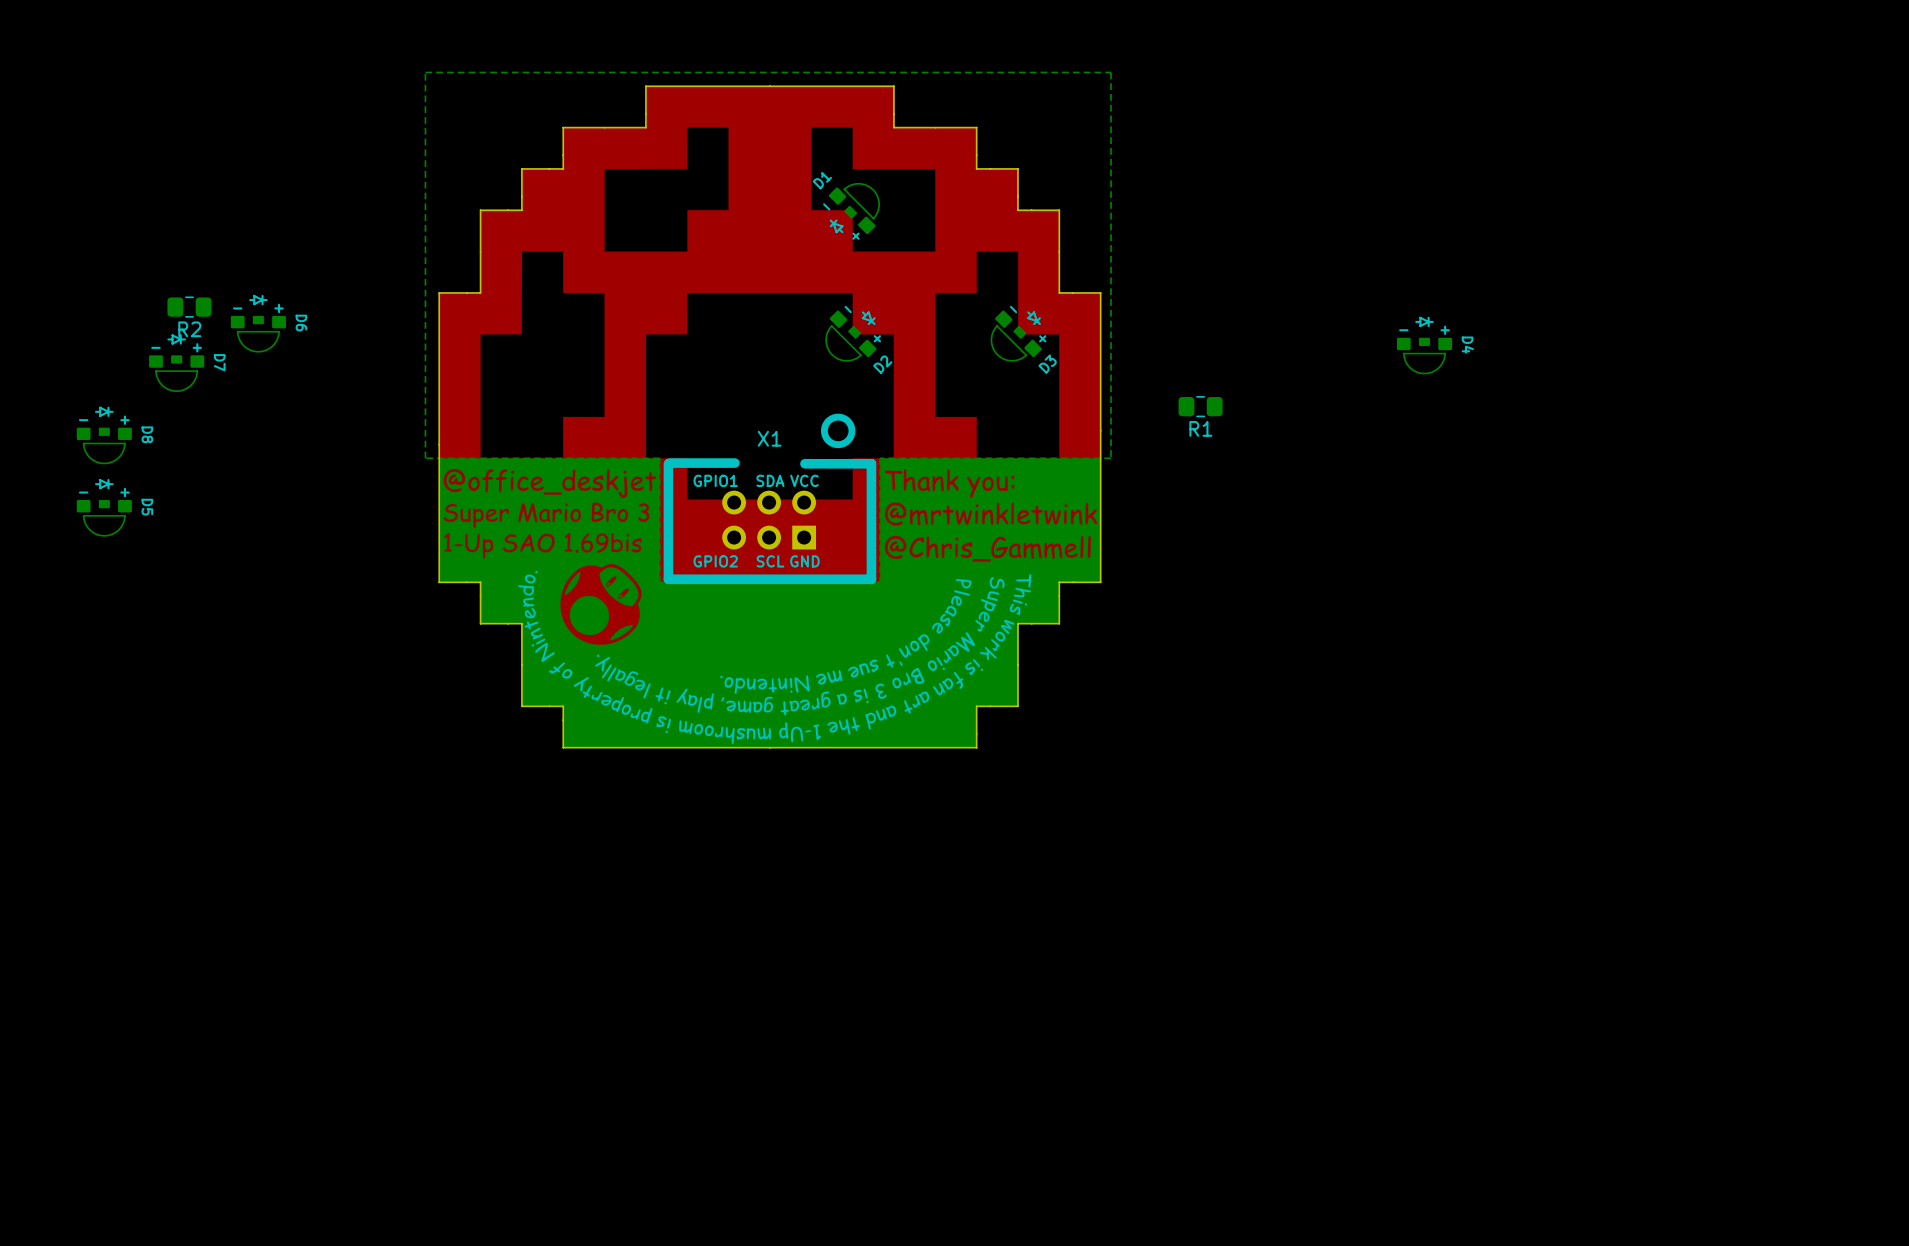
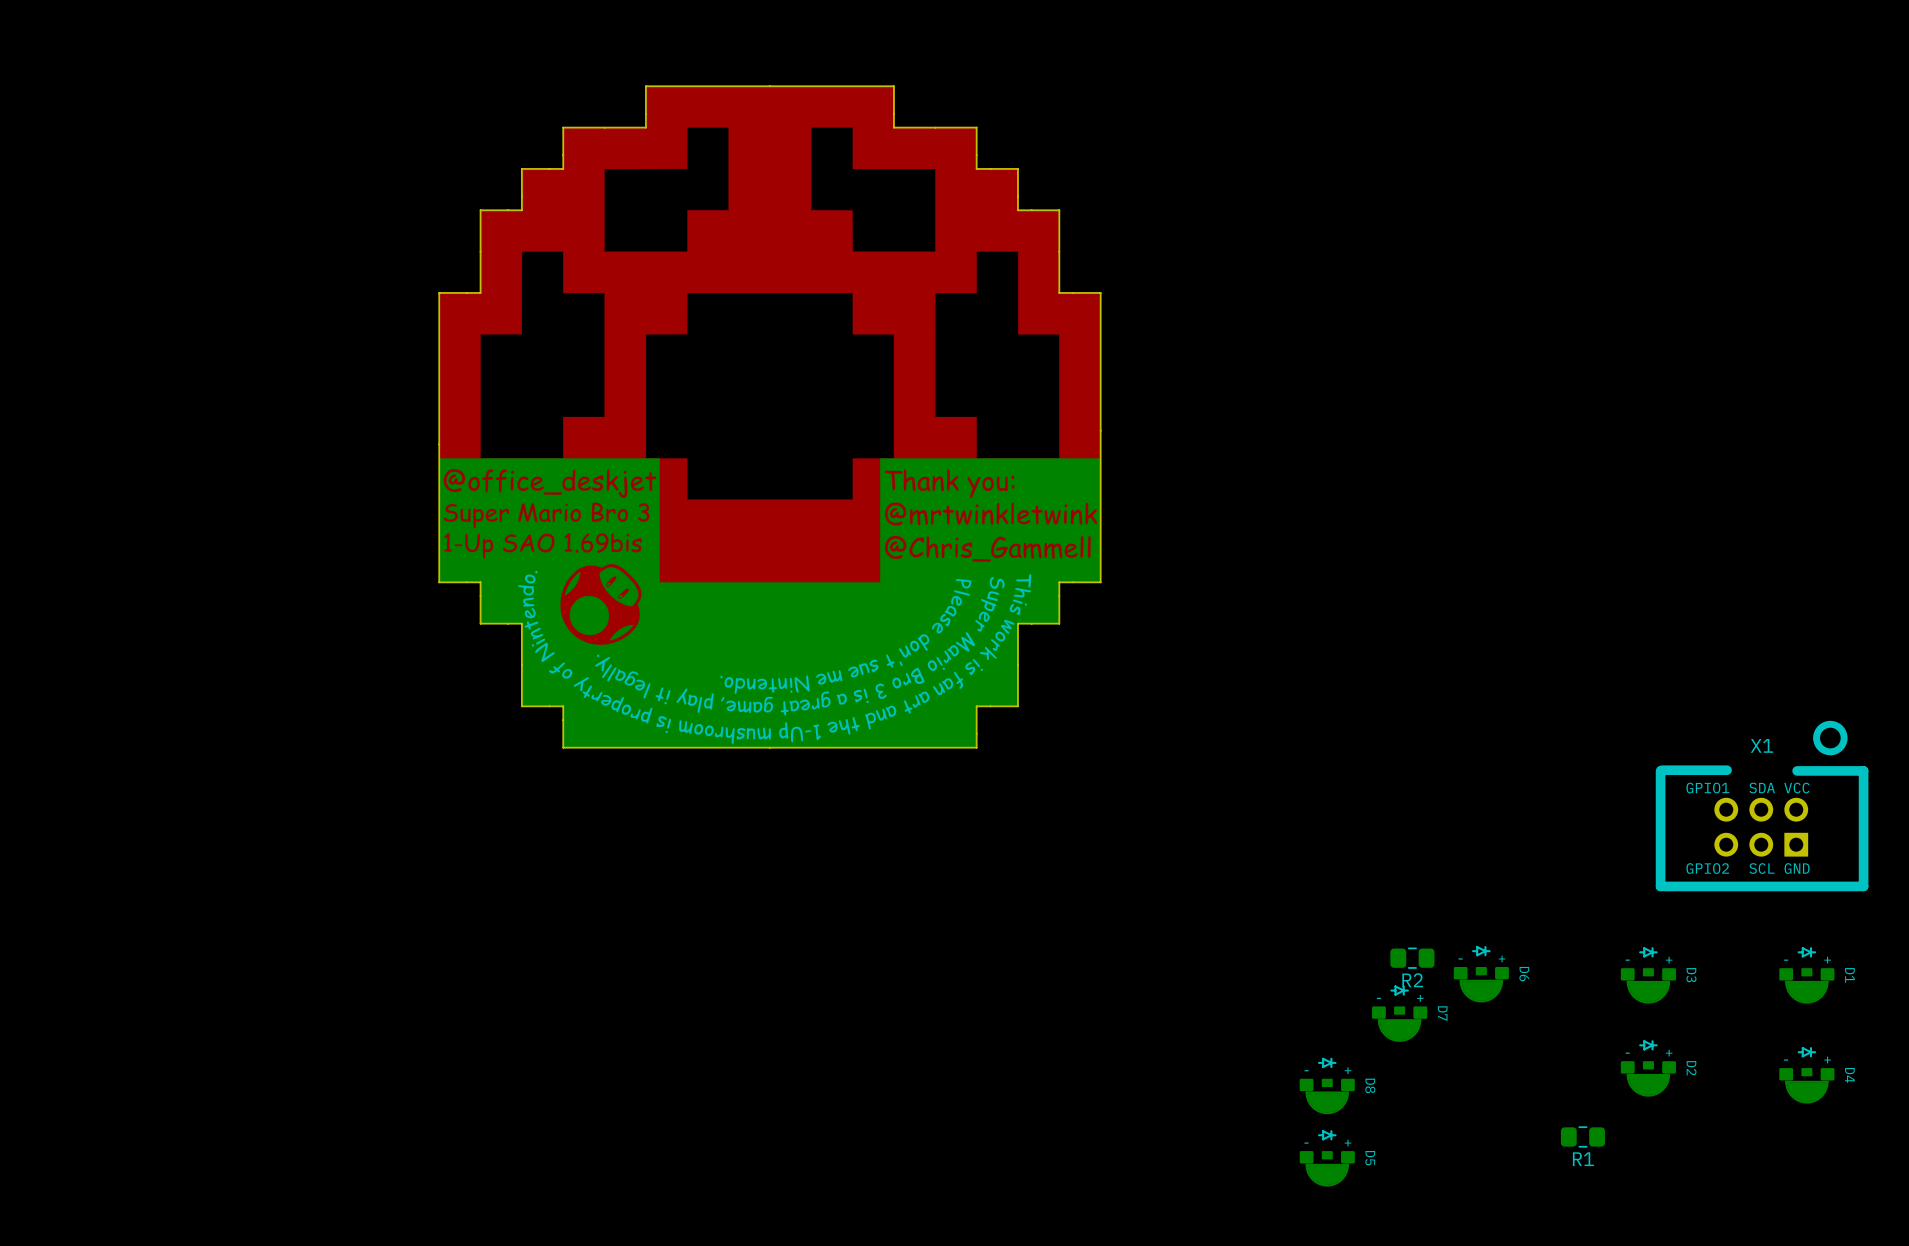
bottom zone outline: (1110, 72) (425, 72) (425, 458) (659, 458) (659, 582) (880, 582) (880, 458) (1110, 458) (1110, 72) -> none
D1 name position: D1 (822, 180) -> D1 (1849, 975)
D1 footprint: [828, 183, 880, 235] -> [1779, 947, 1835, 1004]
D6 footprint: [230, 294, 286, 353] -> [1453, 945, 1509, 1003]
R2 position: (189, 307) -> (1412, 958)
D2 footprint: [825, 310, 877, 362] -> [1620, 1040, 1676, 1097]
D3 footprint: [990, 310, 1042, 362] -> [1620, 947, 1676, 1004]
D4 footprint: [1396, 316, 1453, 375] -> [1779, 1047, 1835, 1104]
D7 footprint: [149, 334, 205, 392] -> [1372, 985, 1428, 1042]
D2 name position: D2 (882, 364) -> D2 (1691, 1068)
D3 name position: D3 (1047, 364) -> D3 (1691, 975)
D8 footprint: [76, 406, 132, 465] -> [1299, 1057, 1355, 1115]
R1 position: (1200, 406) -> (1582, 1136)
D5 footprint: [76, 478, 132, 537] -> [1299, 1130, 1355, 1187]
X1 position: (769, 498) -> (1762, 806)

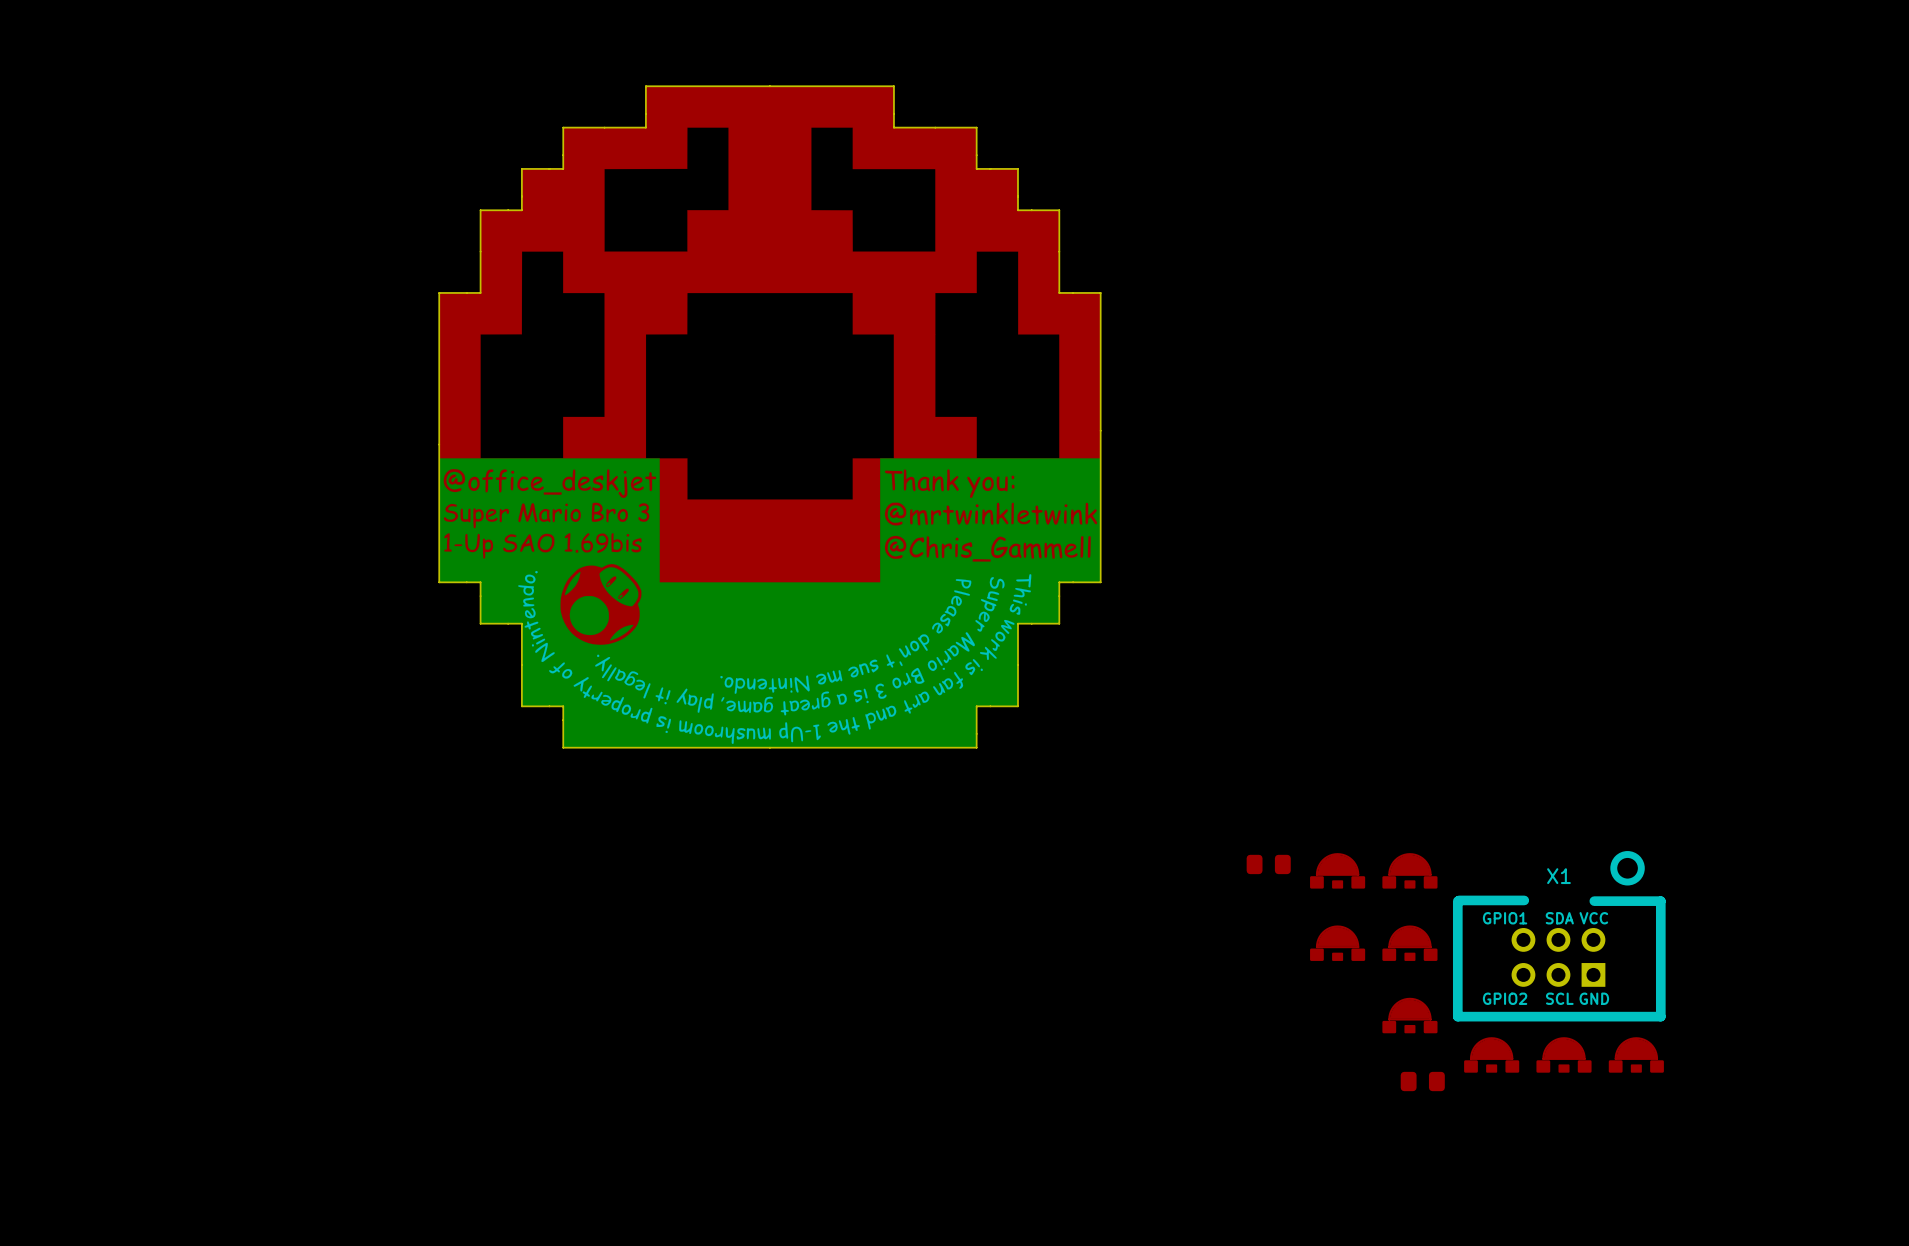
X1 position: (1762, 806) -> (1559, 936)
part: none -> (1268, 864)
part: none -> (1409, 943)
R2 side: bottom (1412, 958) -> top (1422, 1081)
D6 side: bottom (1481, 974) -> top (1491, 1054)
D3 side: bottom (1648, 975) -> top (1564, 1054)
D1 side: bottom (1806, 975) -> top (1636, 1054)
D7 side: bottom (1399, 1013) -> top (1409, 1015)
D2 side: bottom (1648, 1068) -> top (1409, 870)
D4: (1806, 1075) -> none
D8 side: bottom (1327, 1085) -> top (1337, 943)
R1: (1582, 1136) -> none
D5 side: bottom (1327, 1158) -> top (1337, 870)

